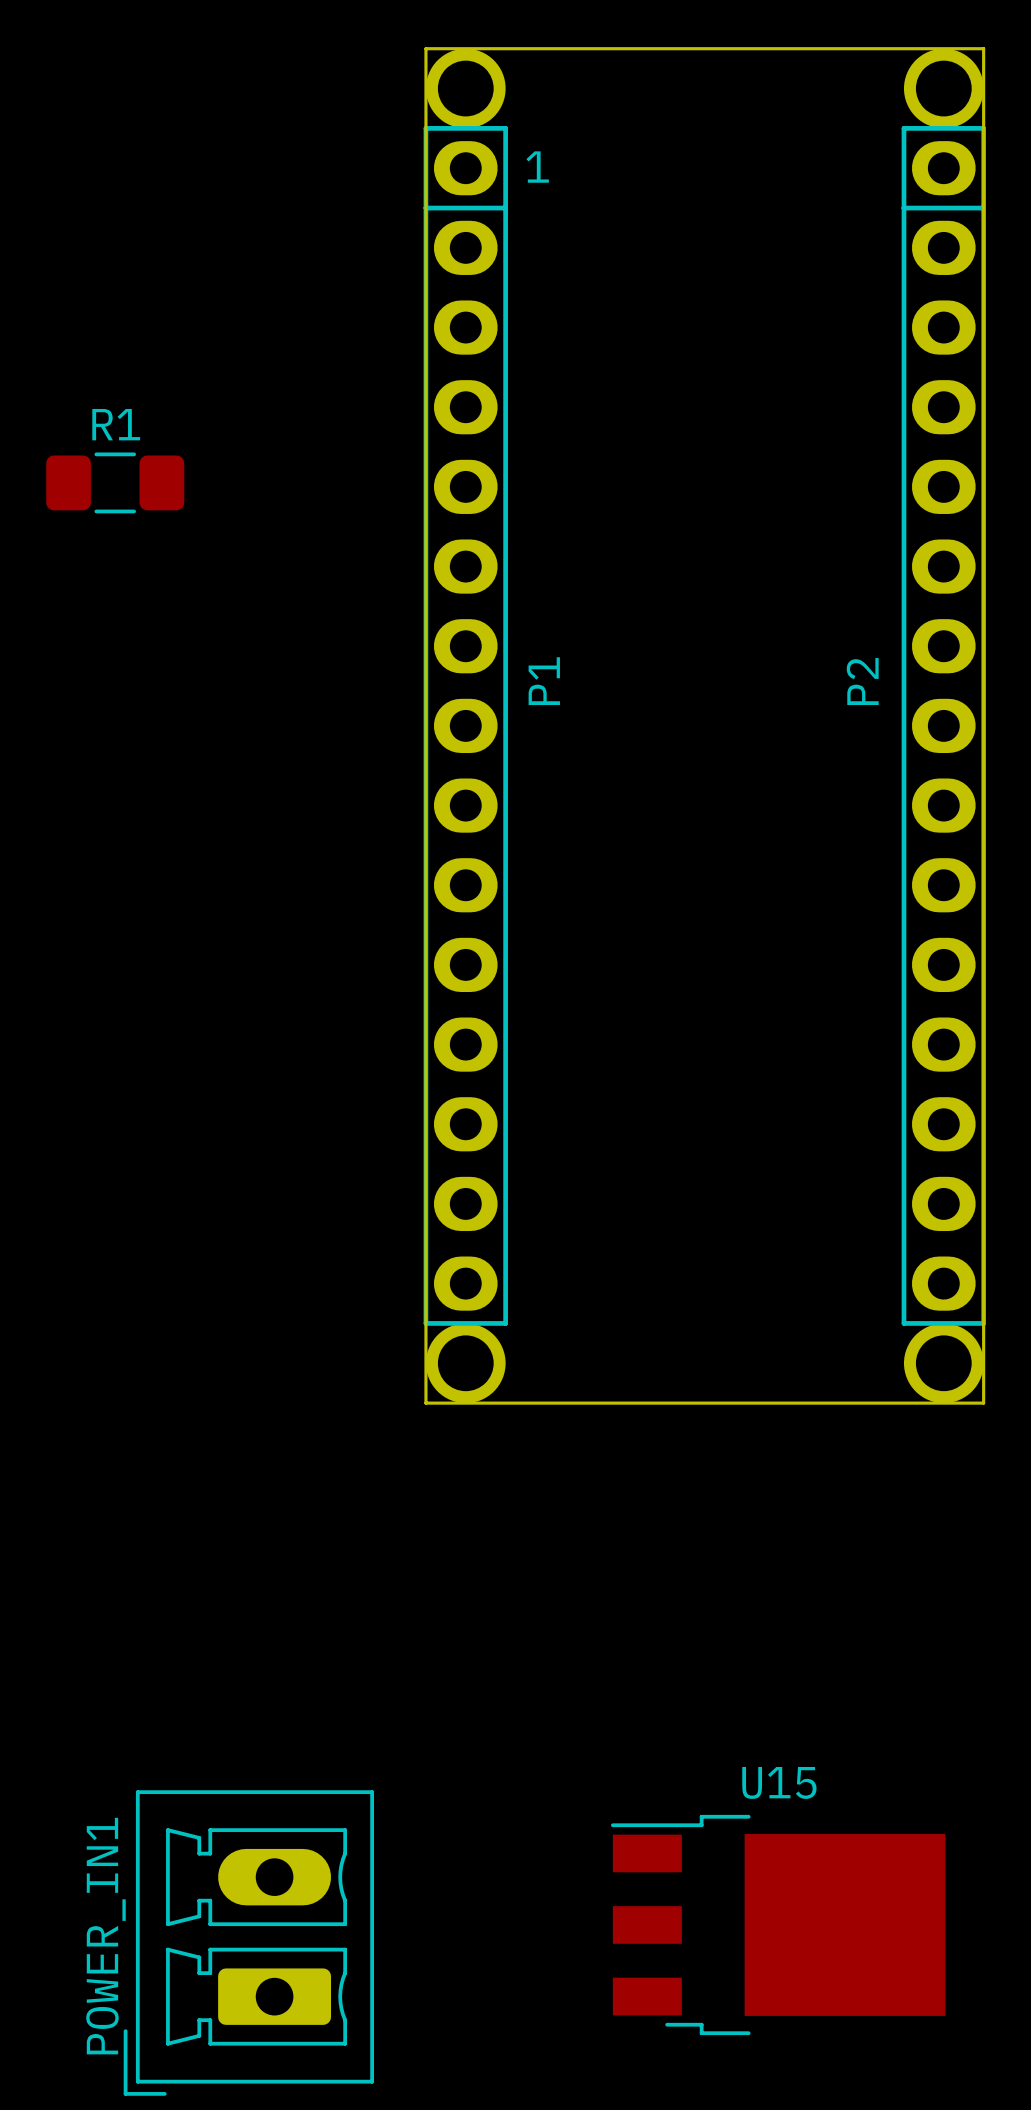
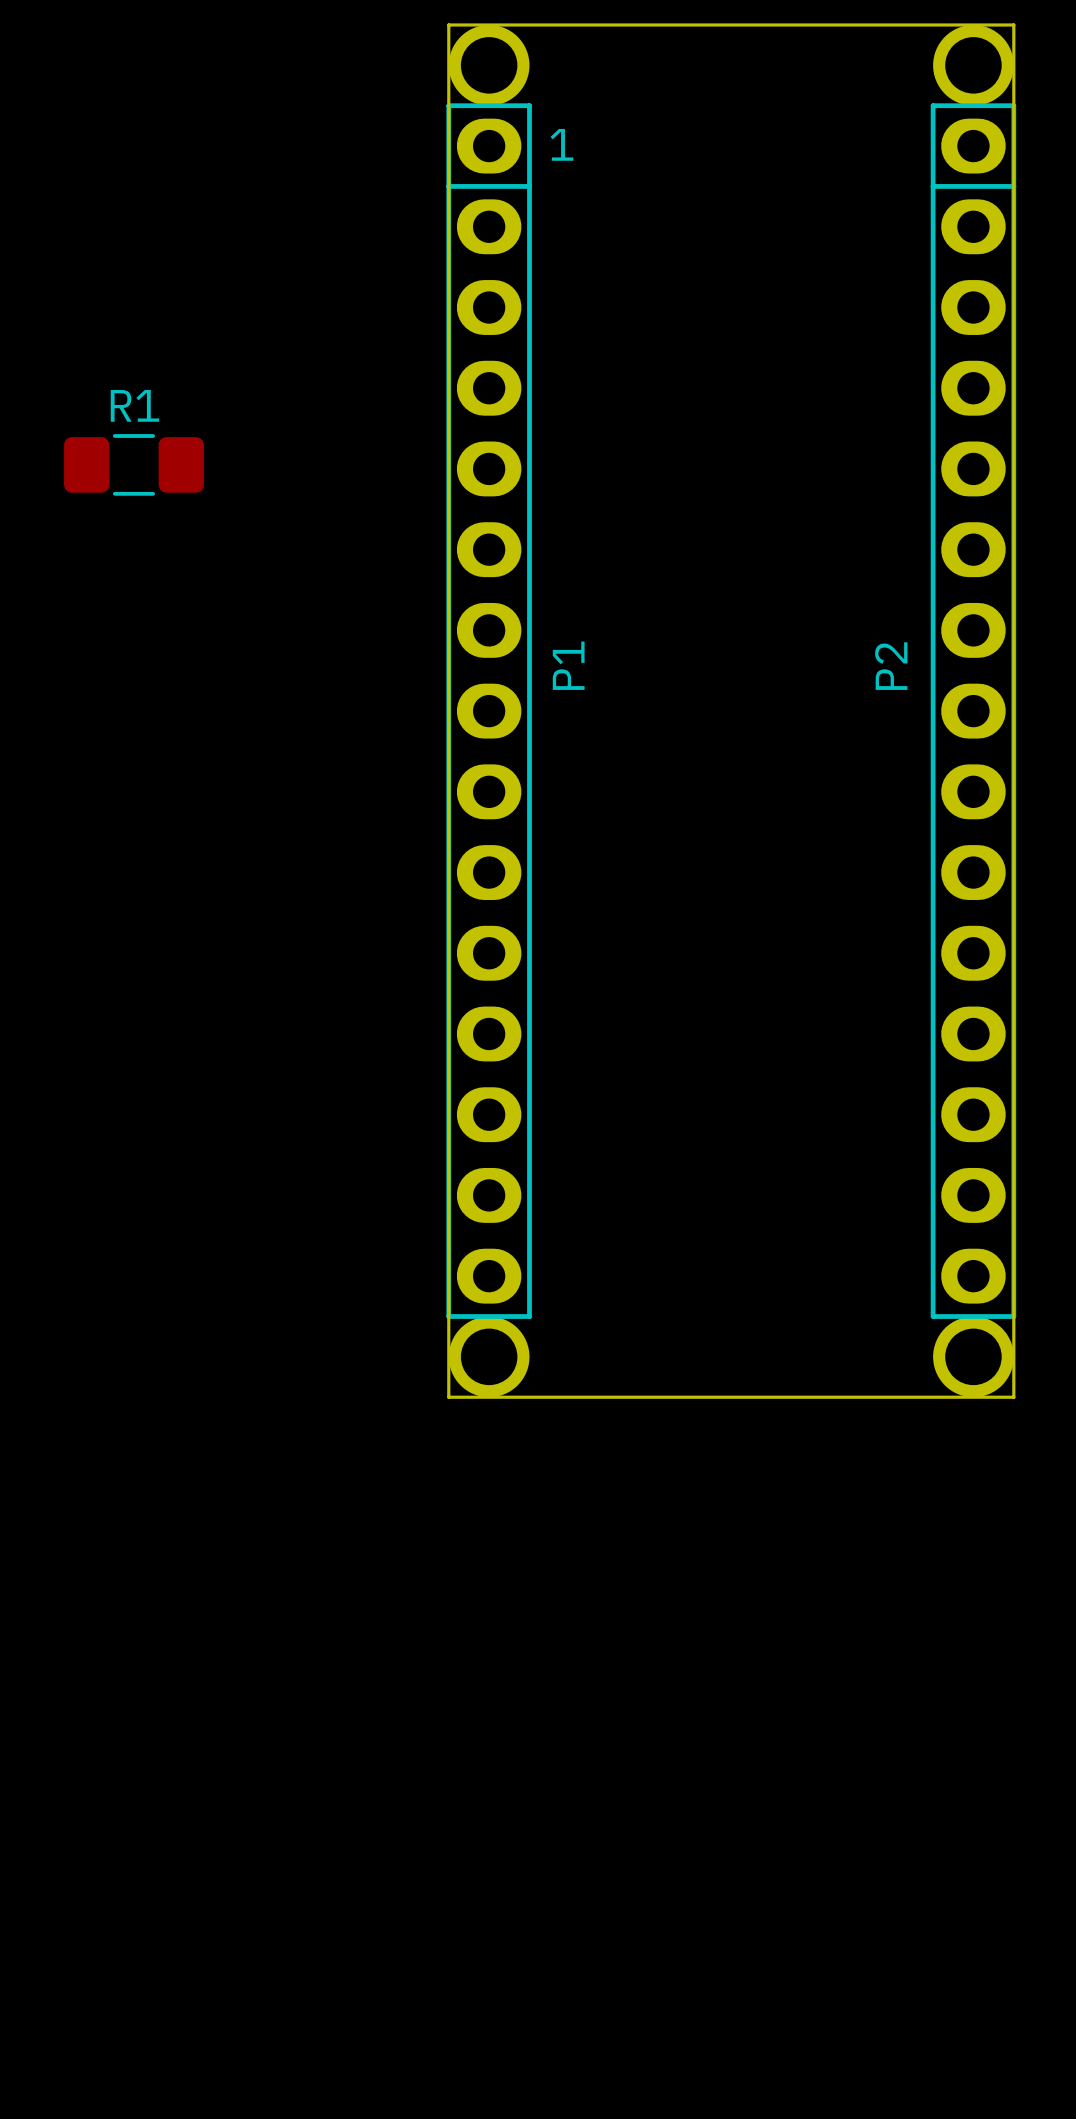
U15: (778, 1924) -> none
POWER_IN1: (248, 1943) -> none

